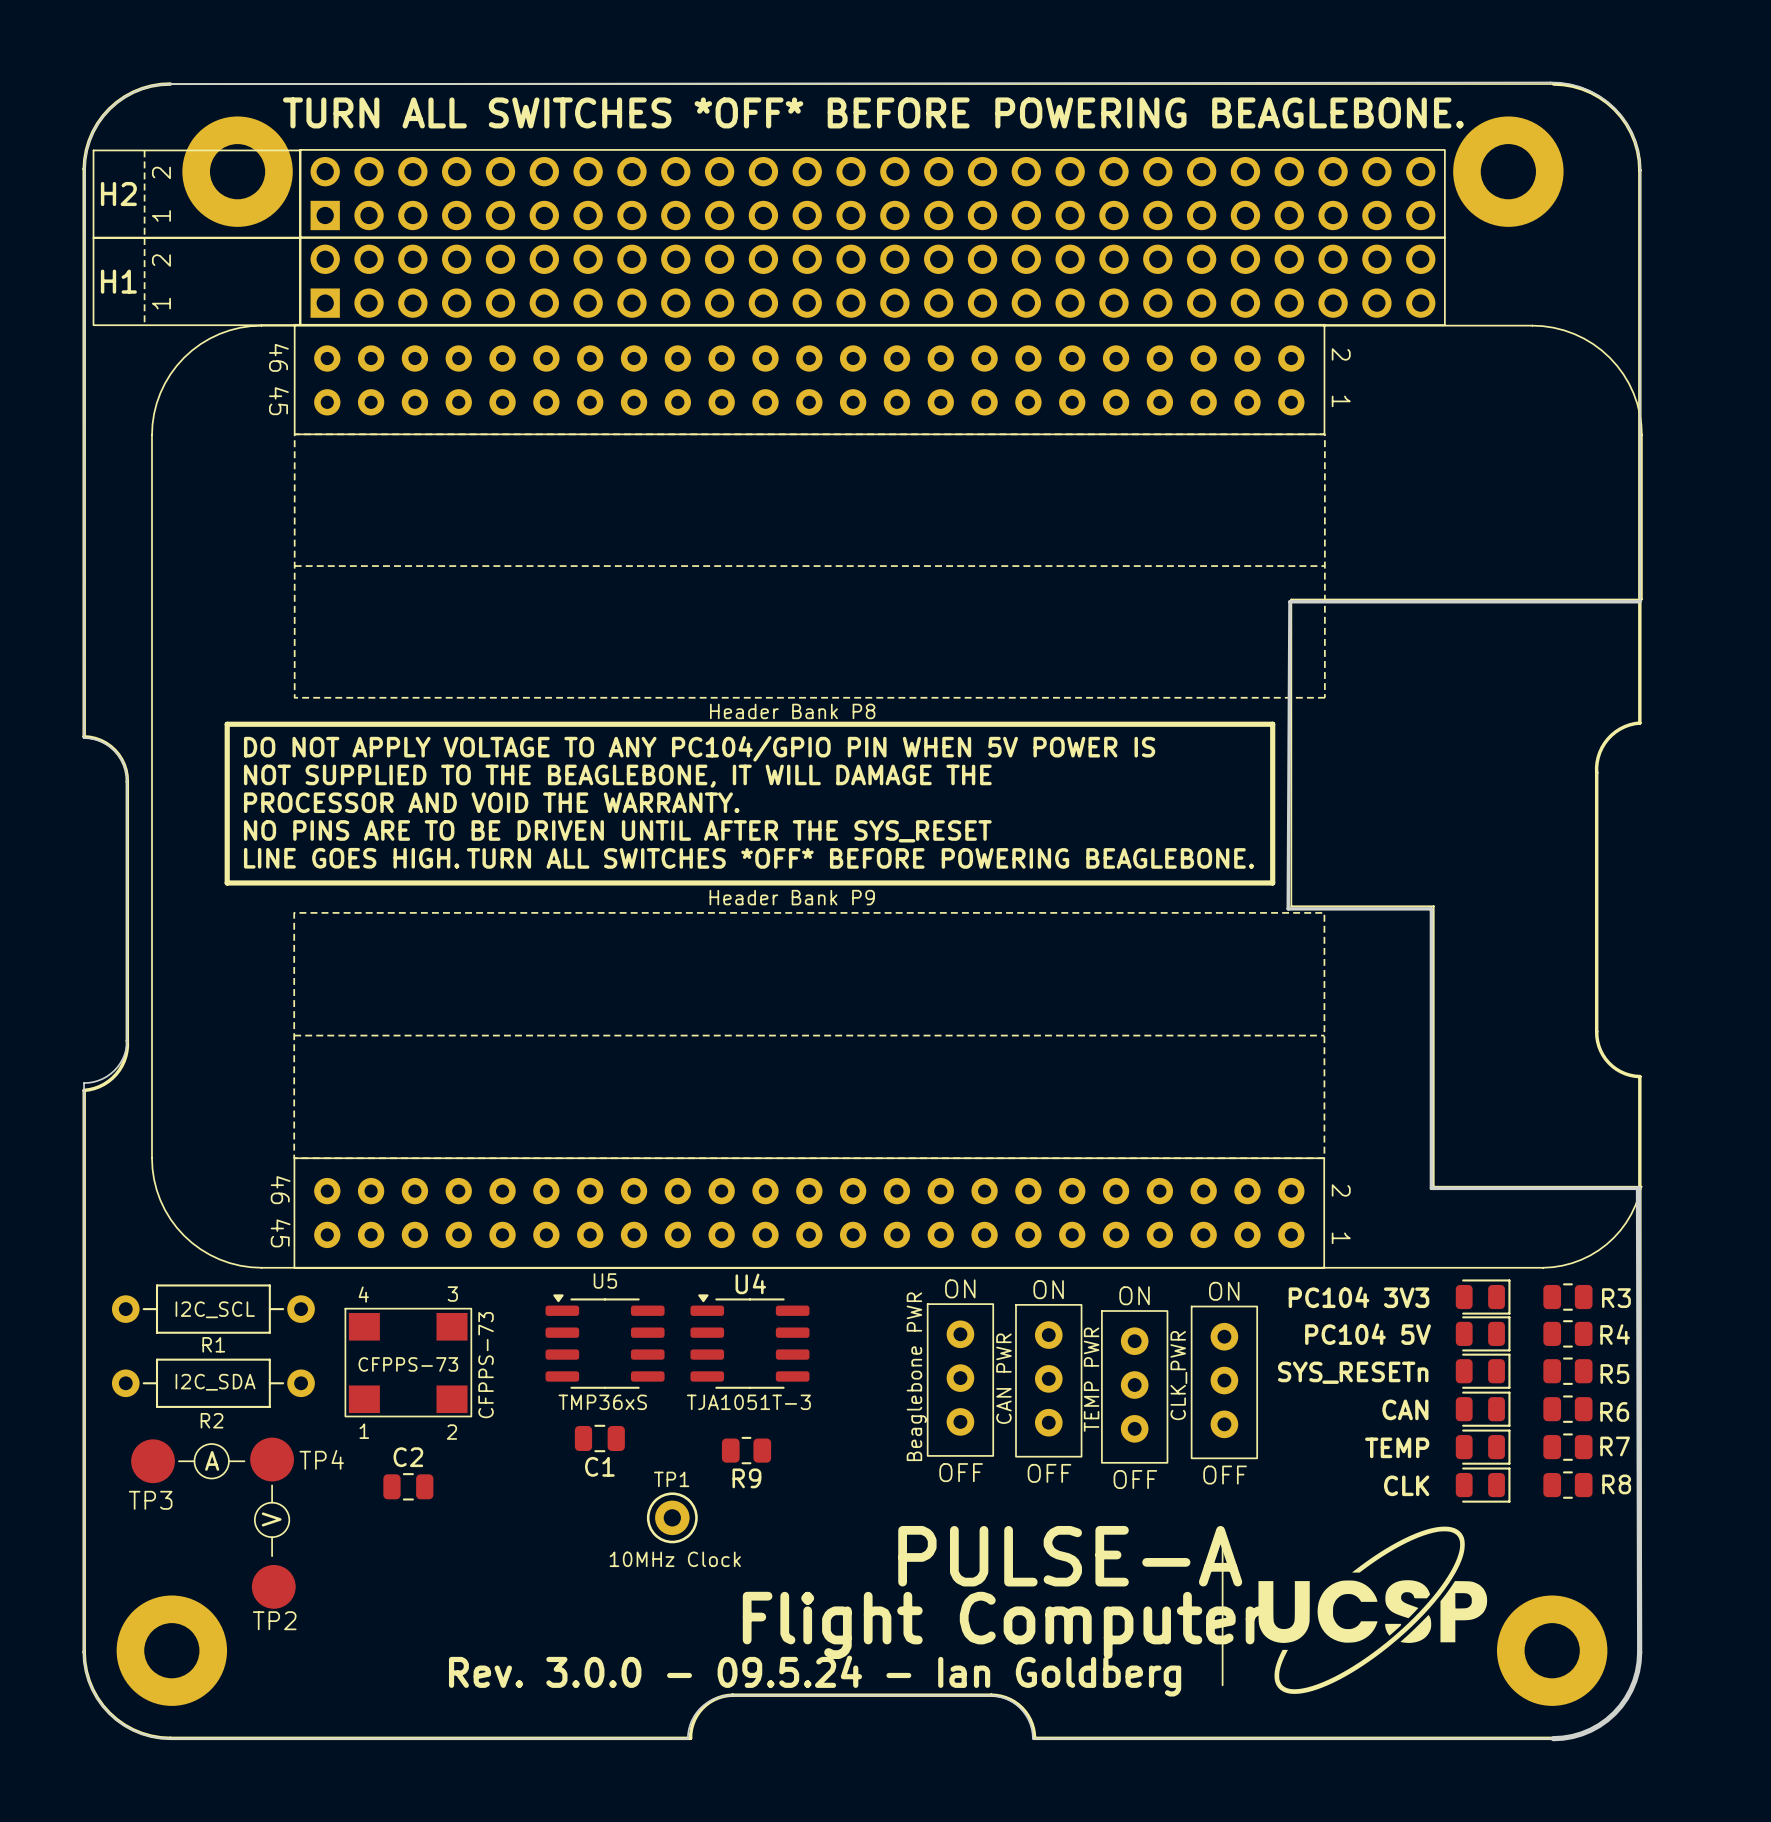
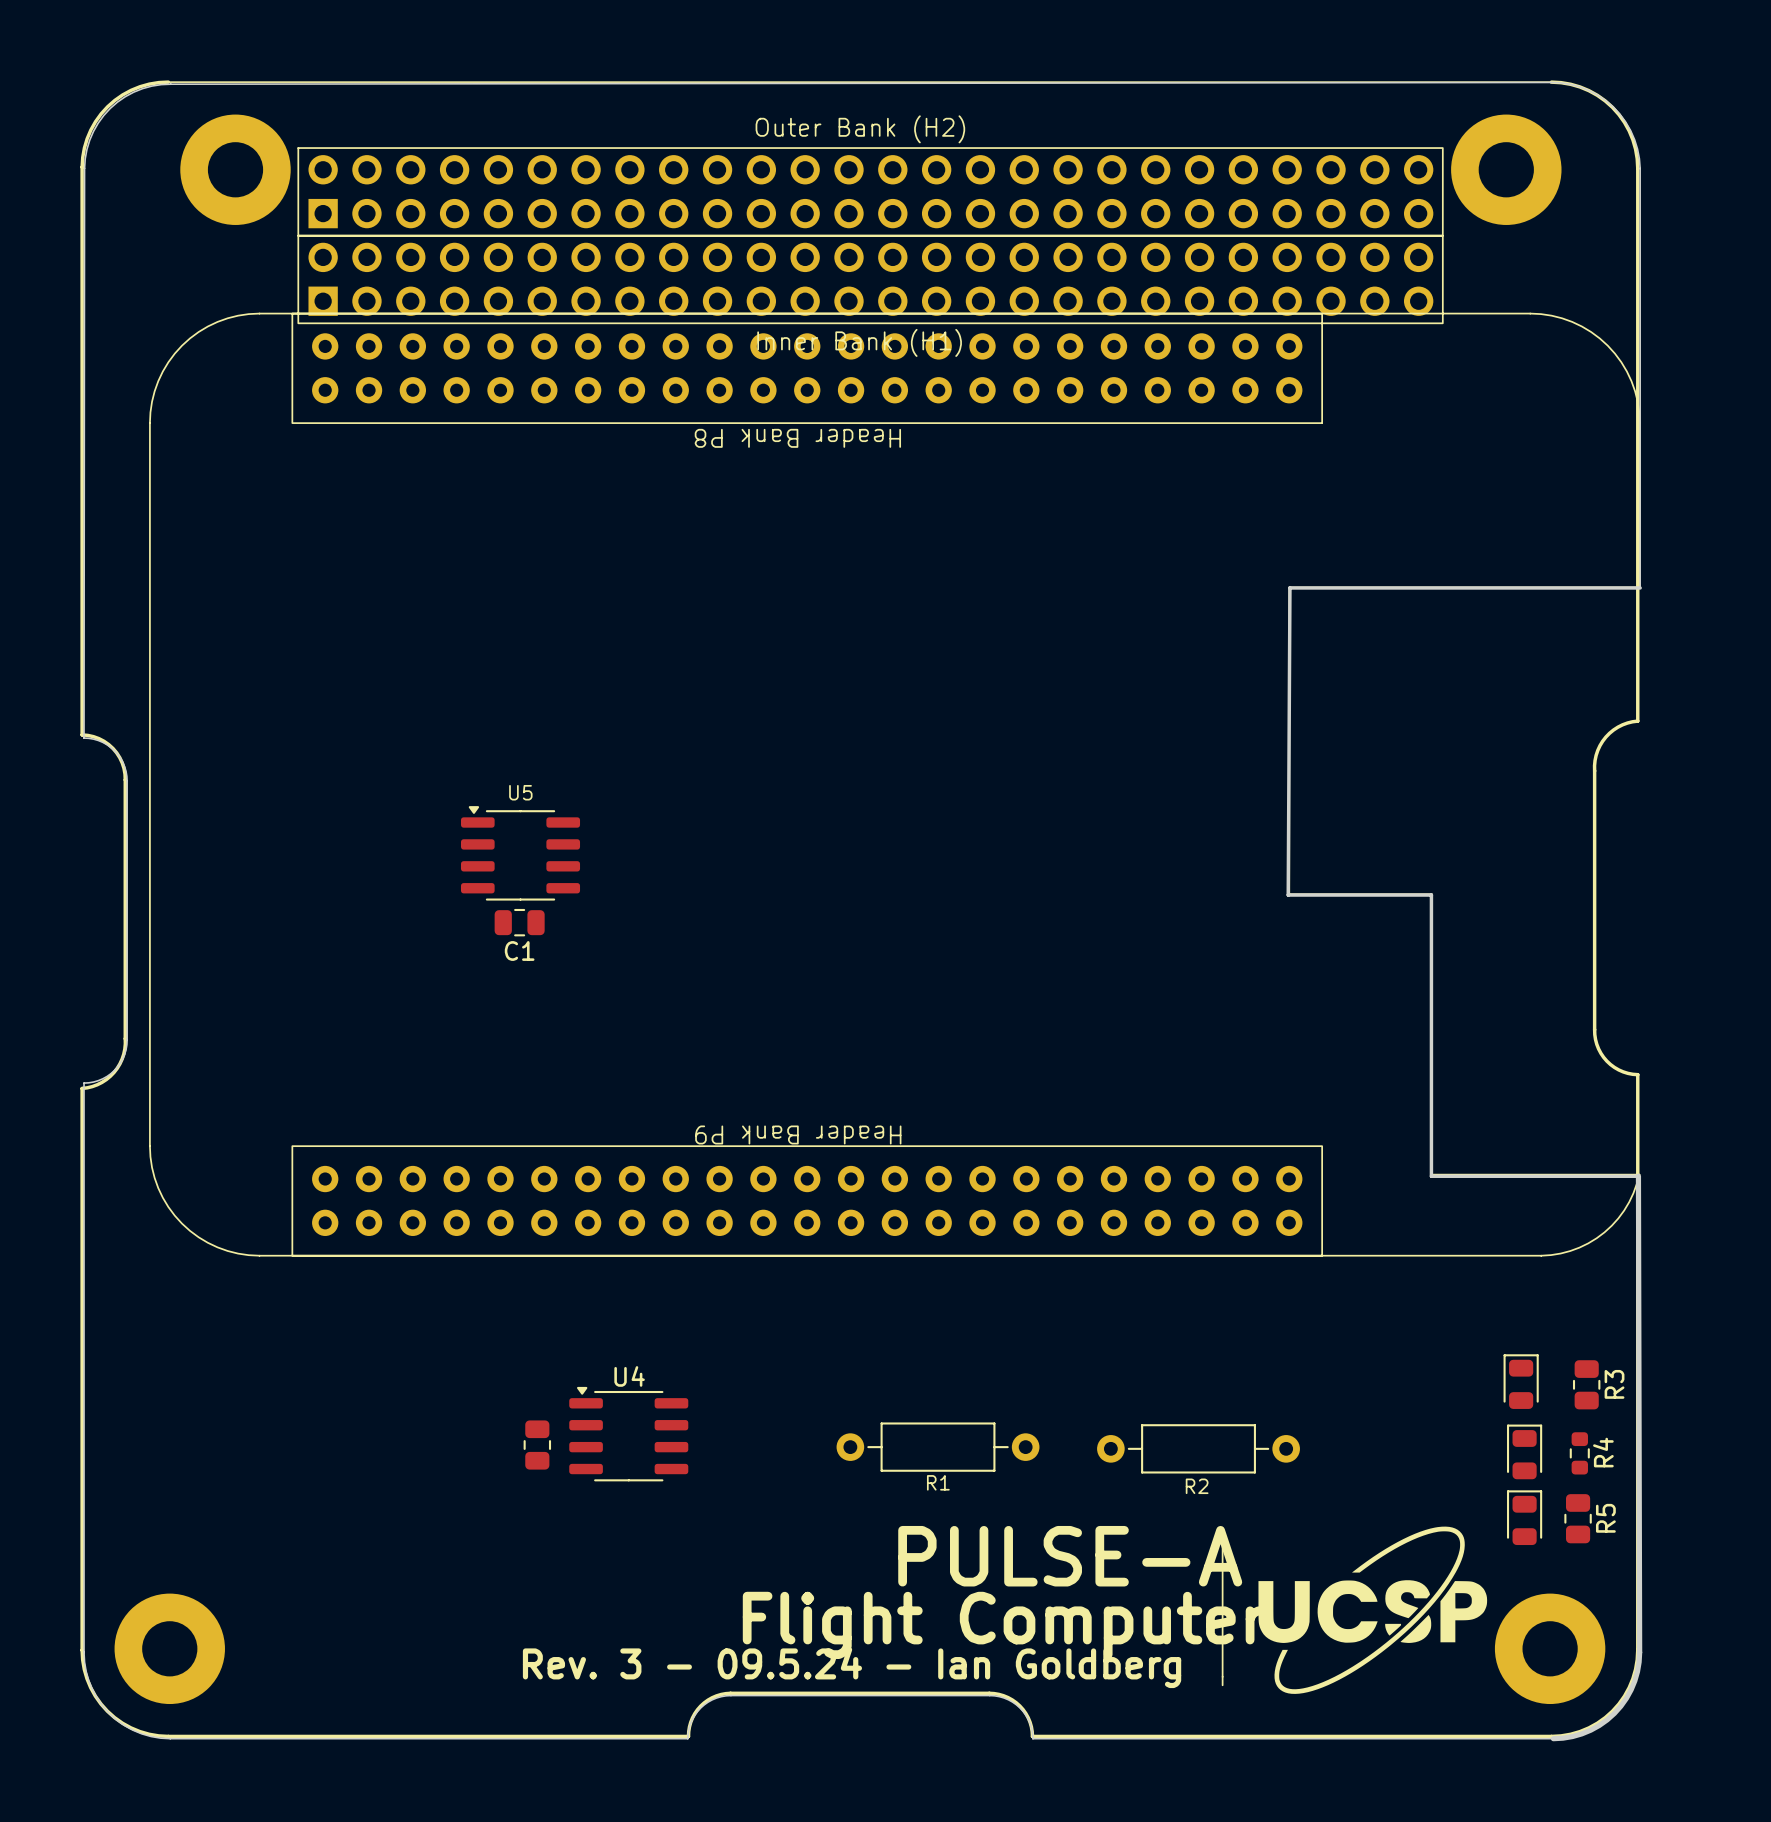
part footprint: [82, 82, 1642, 1741] -> [80, 80, 1640, 1739]
text: TURN ALL SWITCHES *OFF* BEFORE POWERING BEAGLEBONE. (873, 112) -> none
part footprint: [151, 323, 1643, 1269] -> [149, 312, 1641, 1257]
board edge: (1640, 587) (1640, 601) (1289, 601) -> (1640, 587) (1289, 587) (1289, 601)
line: (227, 724) (1272, 724) (1272, 882) (227, 882) (227, 724) -> none
text: DO NOT APPLY VOLTAGE TO ANY PC104/GPIO PIN WHEN 5V POWER IS (699, 748) -> none
text: NOT SUPPLIED TO THE BEAGLEBONE, IT WILL DAMAGE THE (617, 776) -> none
text: PROCESSOR AND VOID THE WARRANTY. (491, 802) -> none
text: NO PINS ARE TO BE DRIVEN UNTIL AFTER THE SYS_RESET (617, 831) -> none
text: LINE GOES HIGH. (351, 858) -> none
text: TURN ALL SWITCHES *OFF* BEFORE POWERING BEAGLEBONE. (860, 858) -> none
board edge: (1288, 895) (1288, 908) (1431, 908) -> (1288, 895) (1431, 895) (1431, 908)
board edge: (1431, 1176) (1431, 1188) (1638, 1188) (1639, 1652) -> (1431, 1176) (1638, 1176) (1639, 1652)
text: PC104 3V3 (1358, 1297) -> none
part: (1483, 1297) -> none
R3 rotation: 0° (1567, 1297) -> 90° clockwise (1586, 1384)
R3 position: (1567, 1297) -> (1586, 1384)
R1 position: (213, 1309) -> (938, 1447)
text: I2C_SCL (215, 1309) -> none
R4 footprint: [1543, 1320, 1593, 1348] -> [1569, 1432, 1590, 1475]
part: (1483, 1333) -> none
text: PC104 5V (1368, 1334) -> none
U5 position: (605, 1341) -> (520, 853)
U4 position: (749, 1341) -> (628, 1434)
part: (408, 1362) -> none
text: CFPPS-73 (486, 1365) -> none
part: (1483, 1371) -> none
R5 rotation: 0° (1567, 1371) -> 90° clockwise (1578, 1518)
R5 position: (1567, 1371) -> (1578, 1518)
text: SYS_RESETn (1353, 1372) -> none
text: CLK_PWR (1178, 1375) -> none
text: Beaglebone PWR (916, 1376) -> none
text: CAN PWR (1003, 1378) -> none
text: TEMP PWR (1091, 1379) -> none
part: (960, 1380) -> none
part: (1048, 1380) -> none
part: none -> (1521, 1381)
text: I2C_SDA (215, 1382) -> none
part: (1224, 1382) -> none
R2 position: (213, 1383) -> (1198, 1448)
part: (1134, 1386) -> none
text: TMP36xS (602, 1402) -> none
text: TJA1051T-3 (748, 1402) -> none
text: CAN (1405, 1409) -> none
part: (1483, 1409) -> none
R6: (1567, 1409) -> none
C1 position: (599, 1438) -> (519, 922)
drawing: [194, 1443, 230, 1479] -> none
part: none -> (537, 1445)
text: TEMP (1397, 1447) -> none
part: (1483, 1447) -> none
R7: (1567, 1447) -> none
R9: (746, 1450) -> none
part: none -> (1524, 1451)
TP4: (272, 1459) -> none
text: A (212, 1460) -> none
TP3: (153, 1461) -> none
line: (178, 1461) (194, 1461) -> none
line: (228, 1461) (244, 1461) -> none
line: (272, 1485) (272, 1502) -> none
text: CLK (1406, 1485) -> none
part: (1483, 1485) -> none
R8: (1567, 1485) -> none
C2: (408, 1486) -> none
drawing: [254, 1502, 290, 1538] -> none
TP1: (672, 1517) -> none
part: none -> (1524, 1517)
text: V (271, 1519) -> none
line: (272, 1537) (272, 1556) -> none
text: 10MHz Clock (675, 1559) -> none
TP2: (273, 1586) -> none
text: Rev. 3.0.0 - 09.5.24 - Ian Goldberg (815, 1676) -> Rev. 3 - 09.5.24 - Ian Goldberg (852, 1667)

